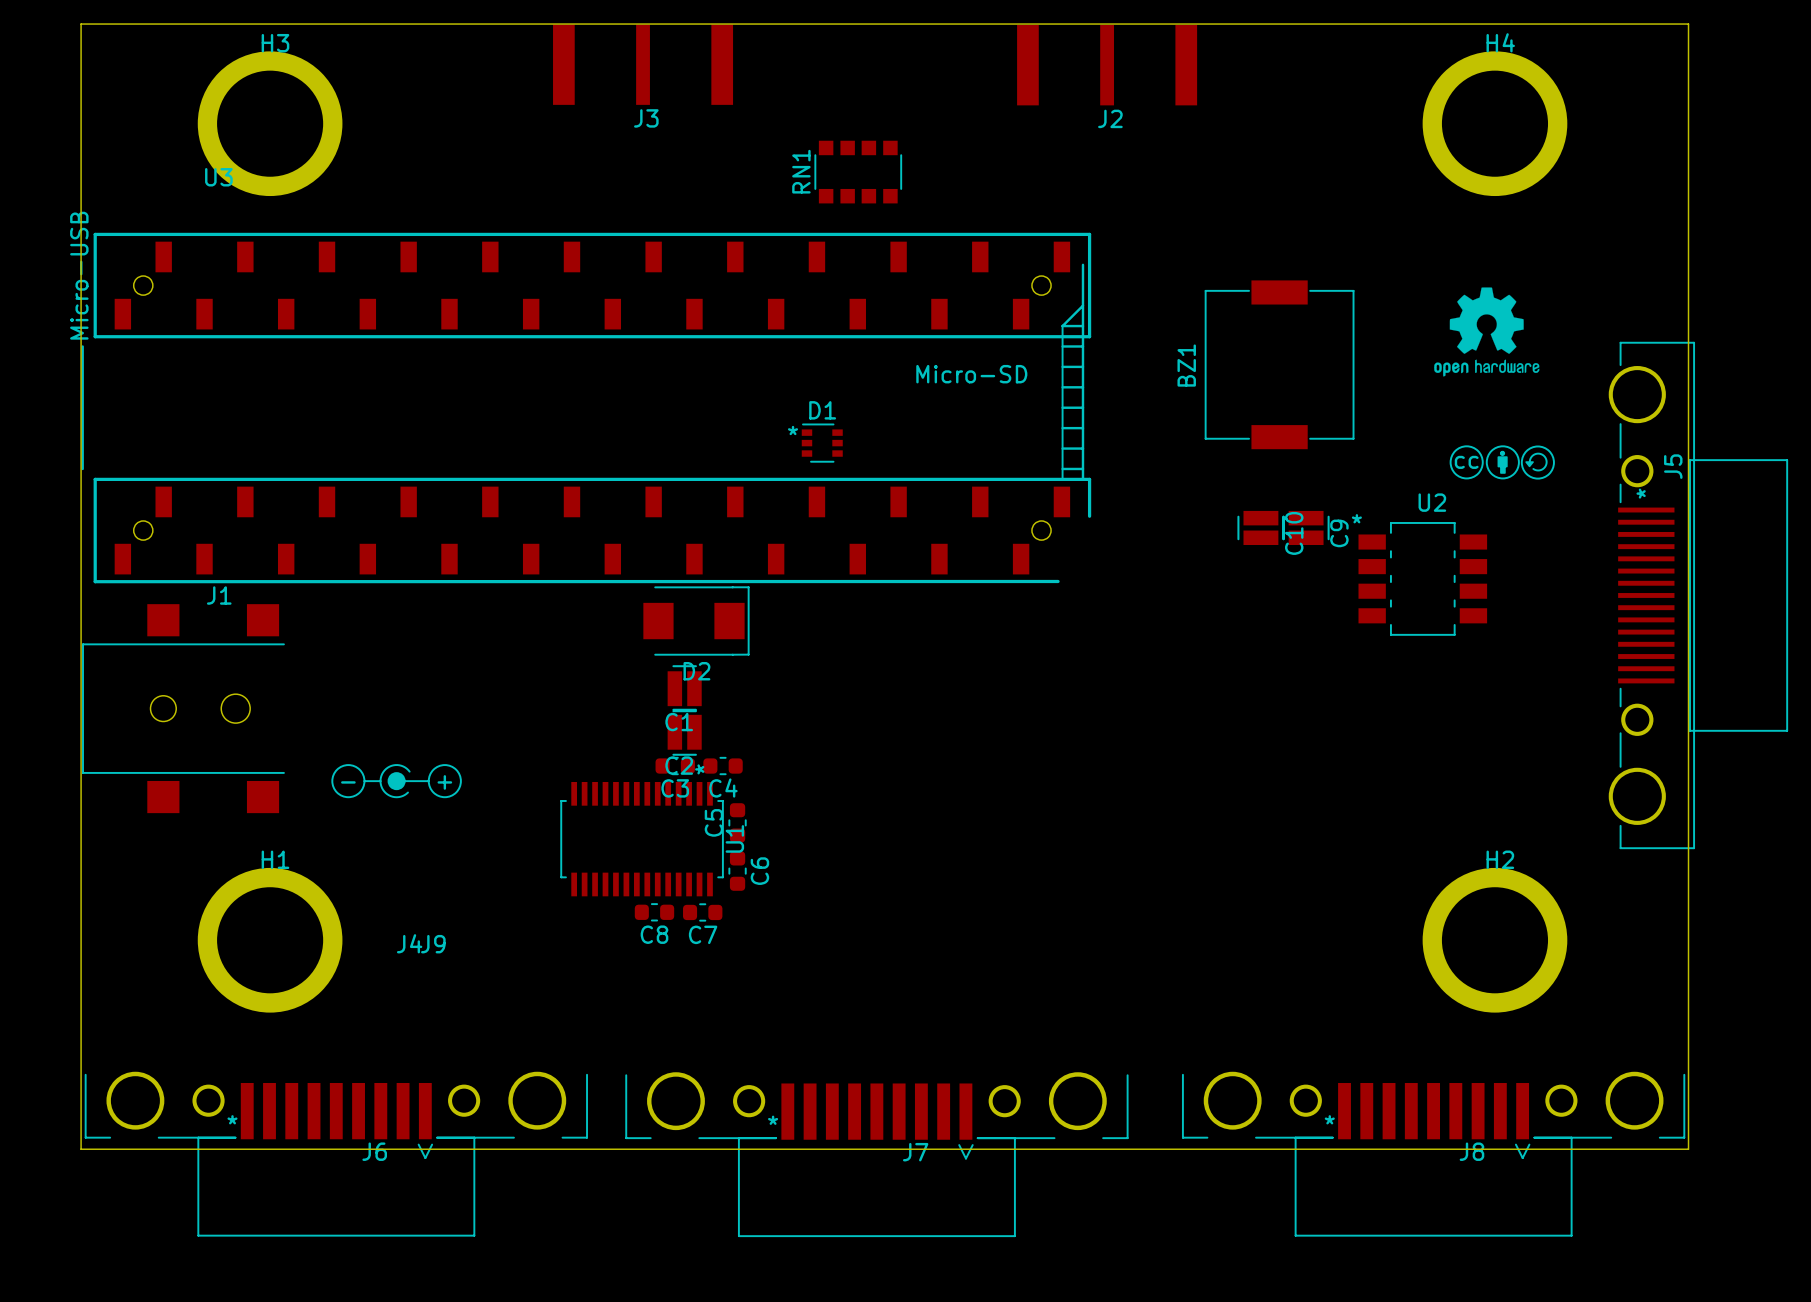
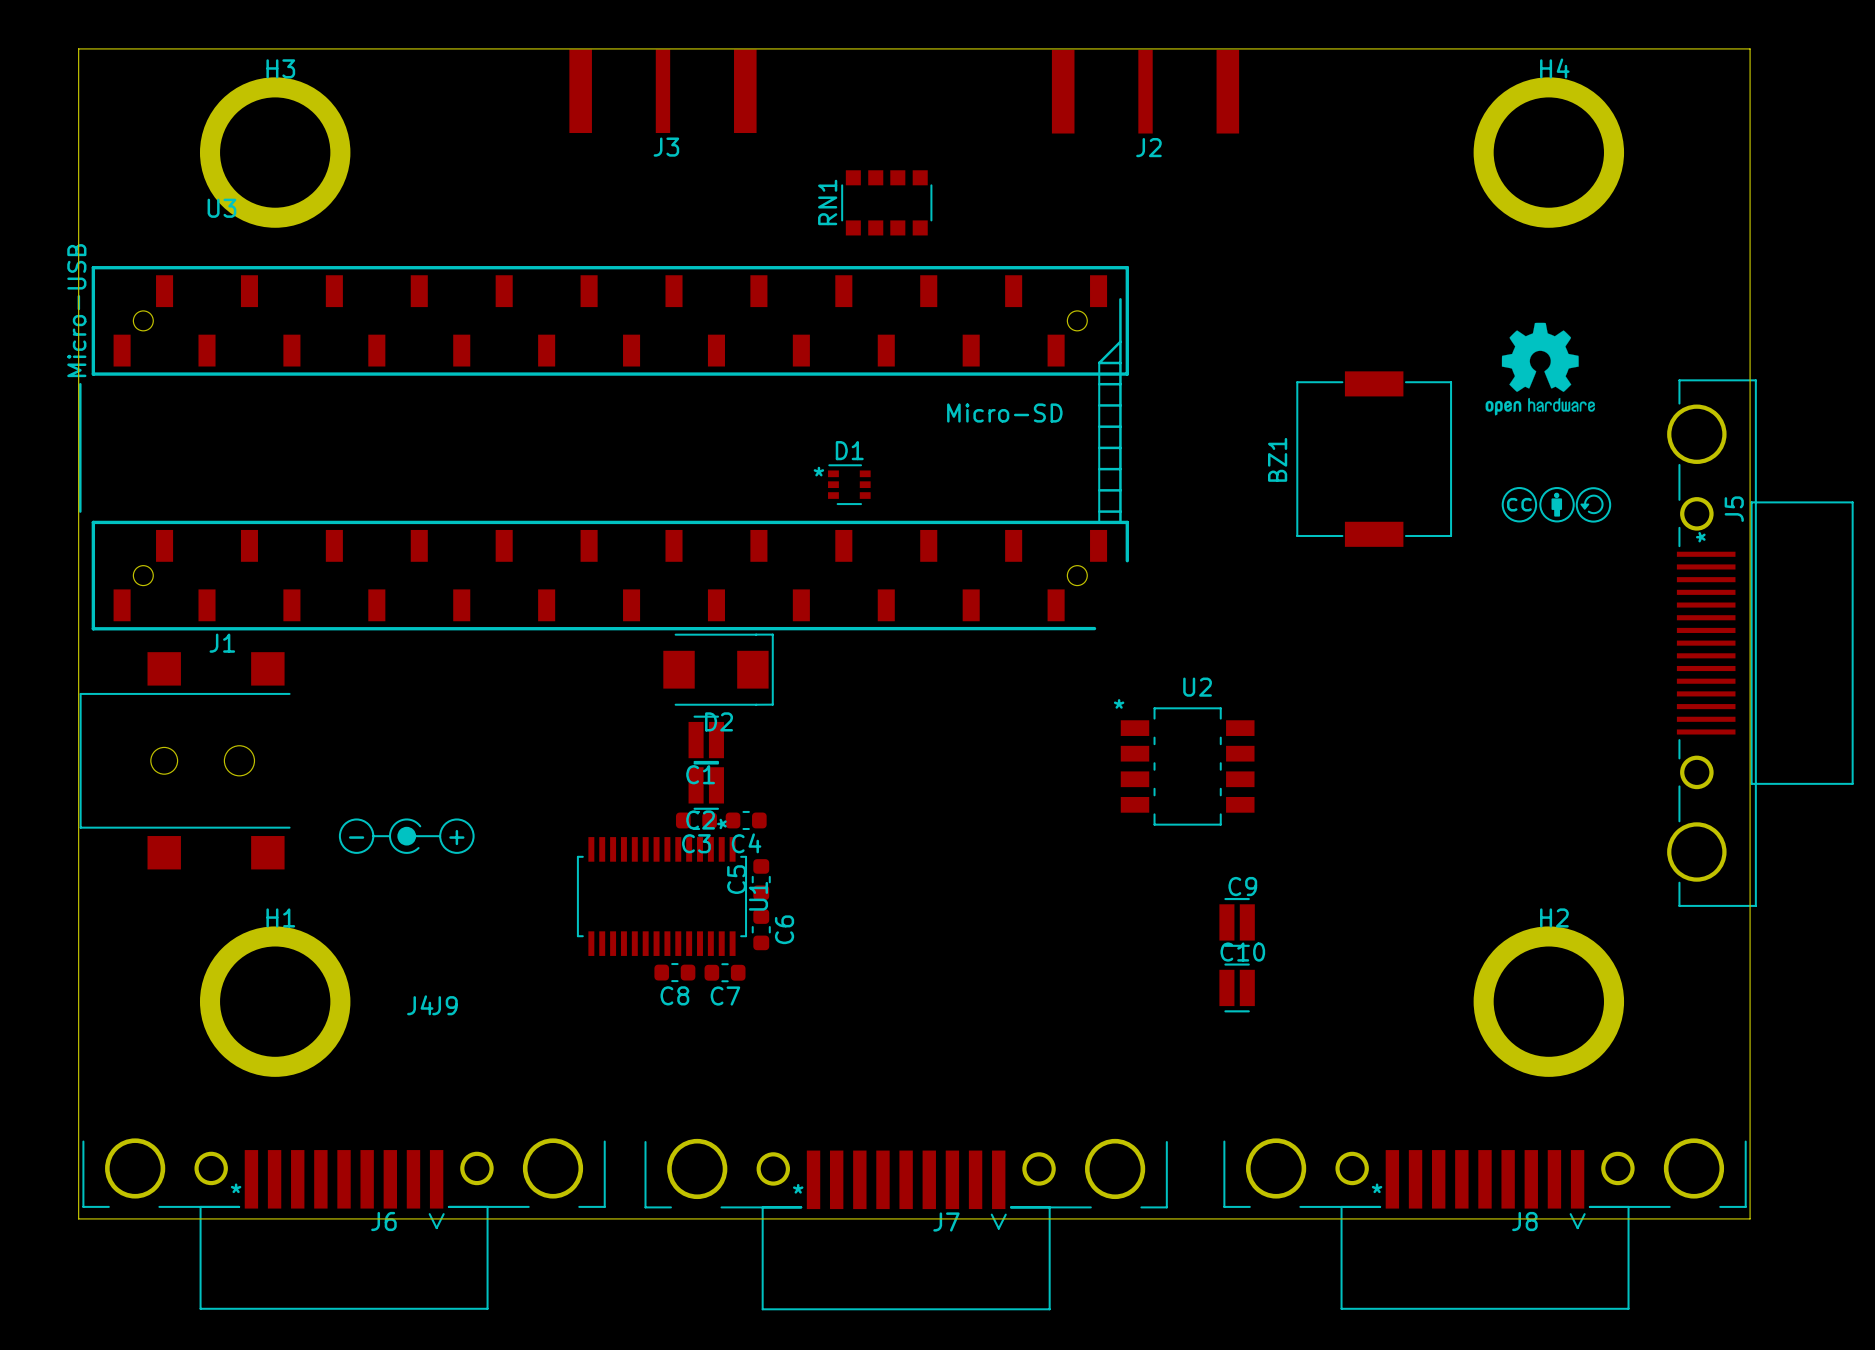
BZ1 position: (1279, 364) -> (1374, 459)
C10 rotation: 0° (1260, 527) -> 90° clockwise (1237, 987)
C10 position: (1260, 527) -> (1237, 987)
C9 rotation: 0° (1306, 527) -> 90° clockwise (1237, 922)
C9 position: (1306, 527) -> (1237, 922)
C10 name position: C10 (1294, 533) -> C10 (1242, 952)
C9 name position: C9 (1339, 533) -> C9 (1242, 886)
U2 position: (1422, 578) -> (1187, 766)

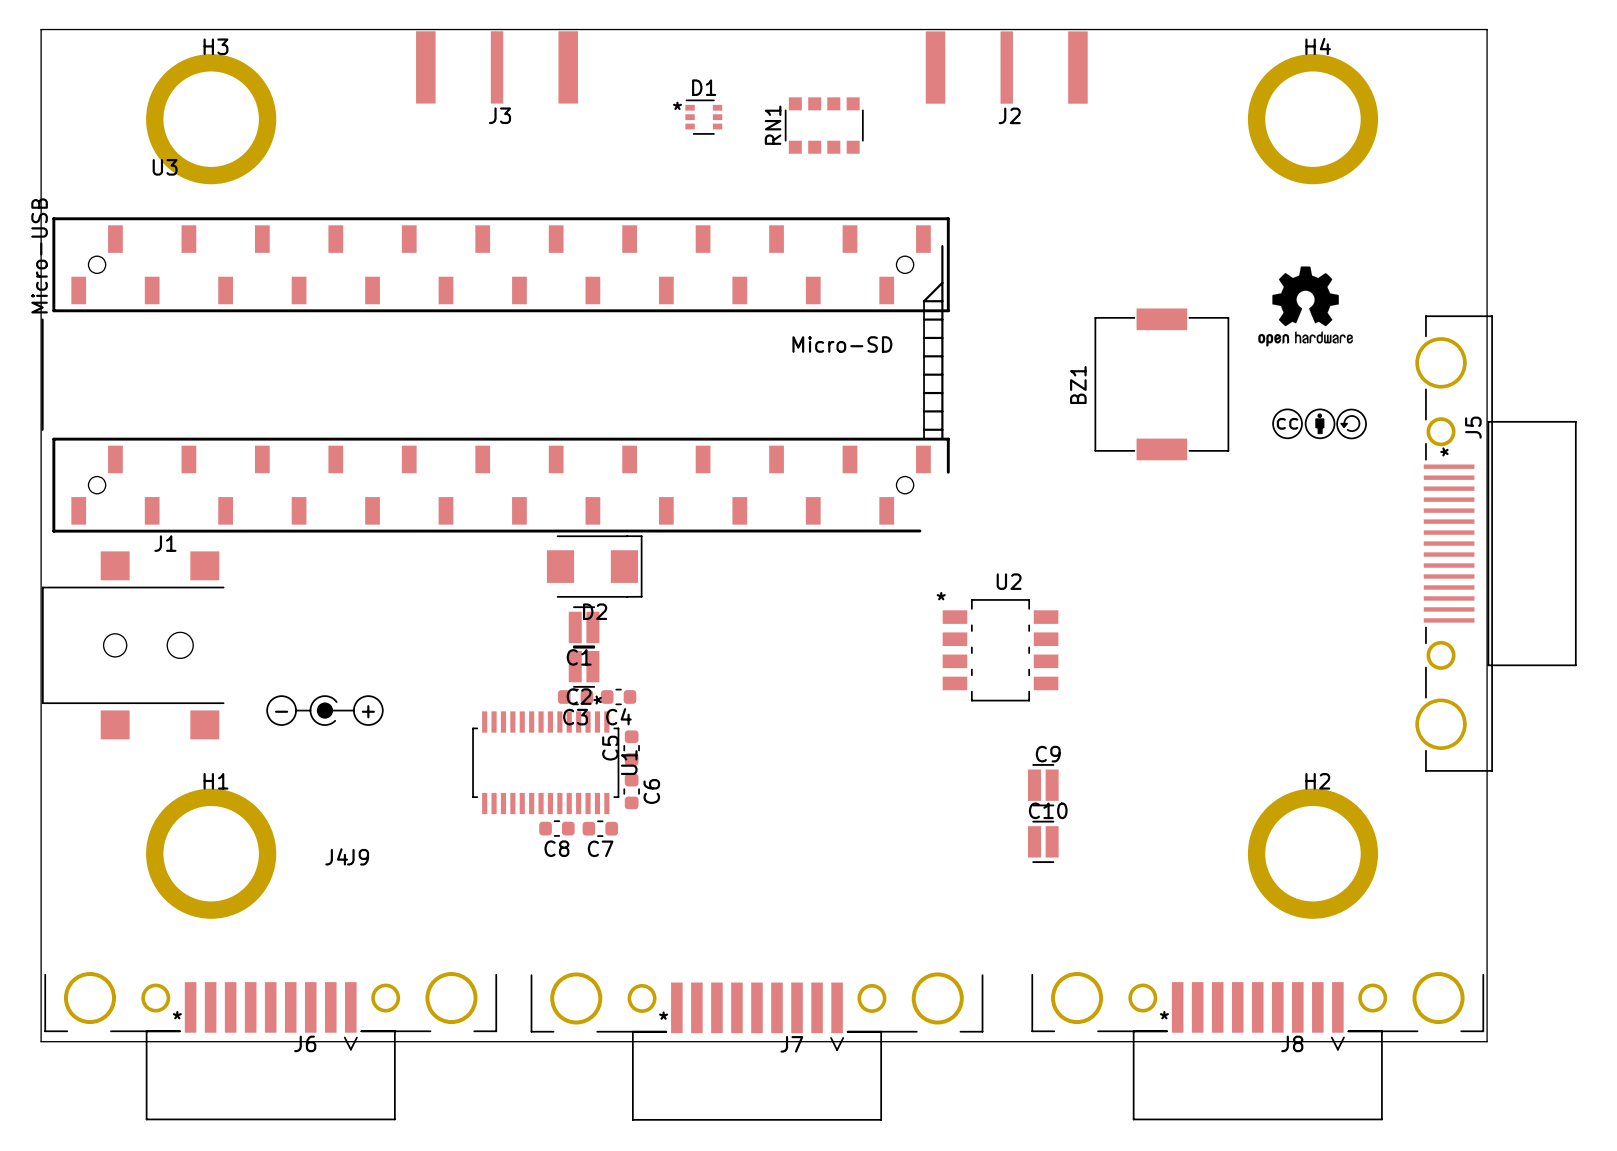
J3 position: (662, 91) -> (497, 67)
J2 position: (1145, 91) -> (1006, 67)
RN1 position: (886, 202) -> (824, 125)
D1 position: (849, 484) -> (703, 117)

